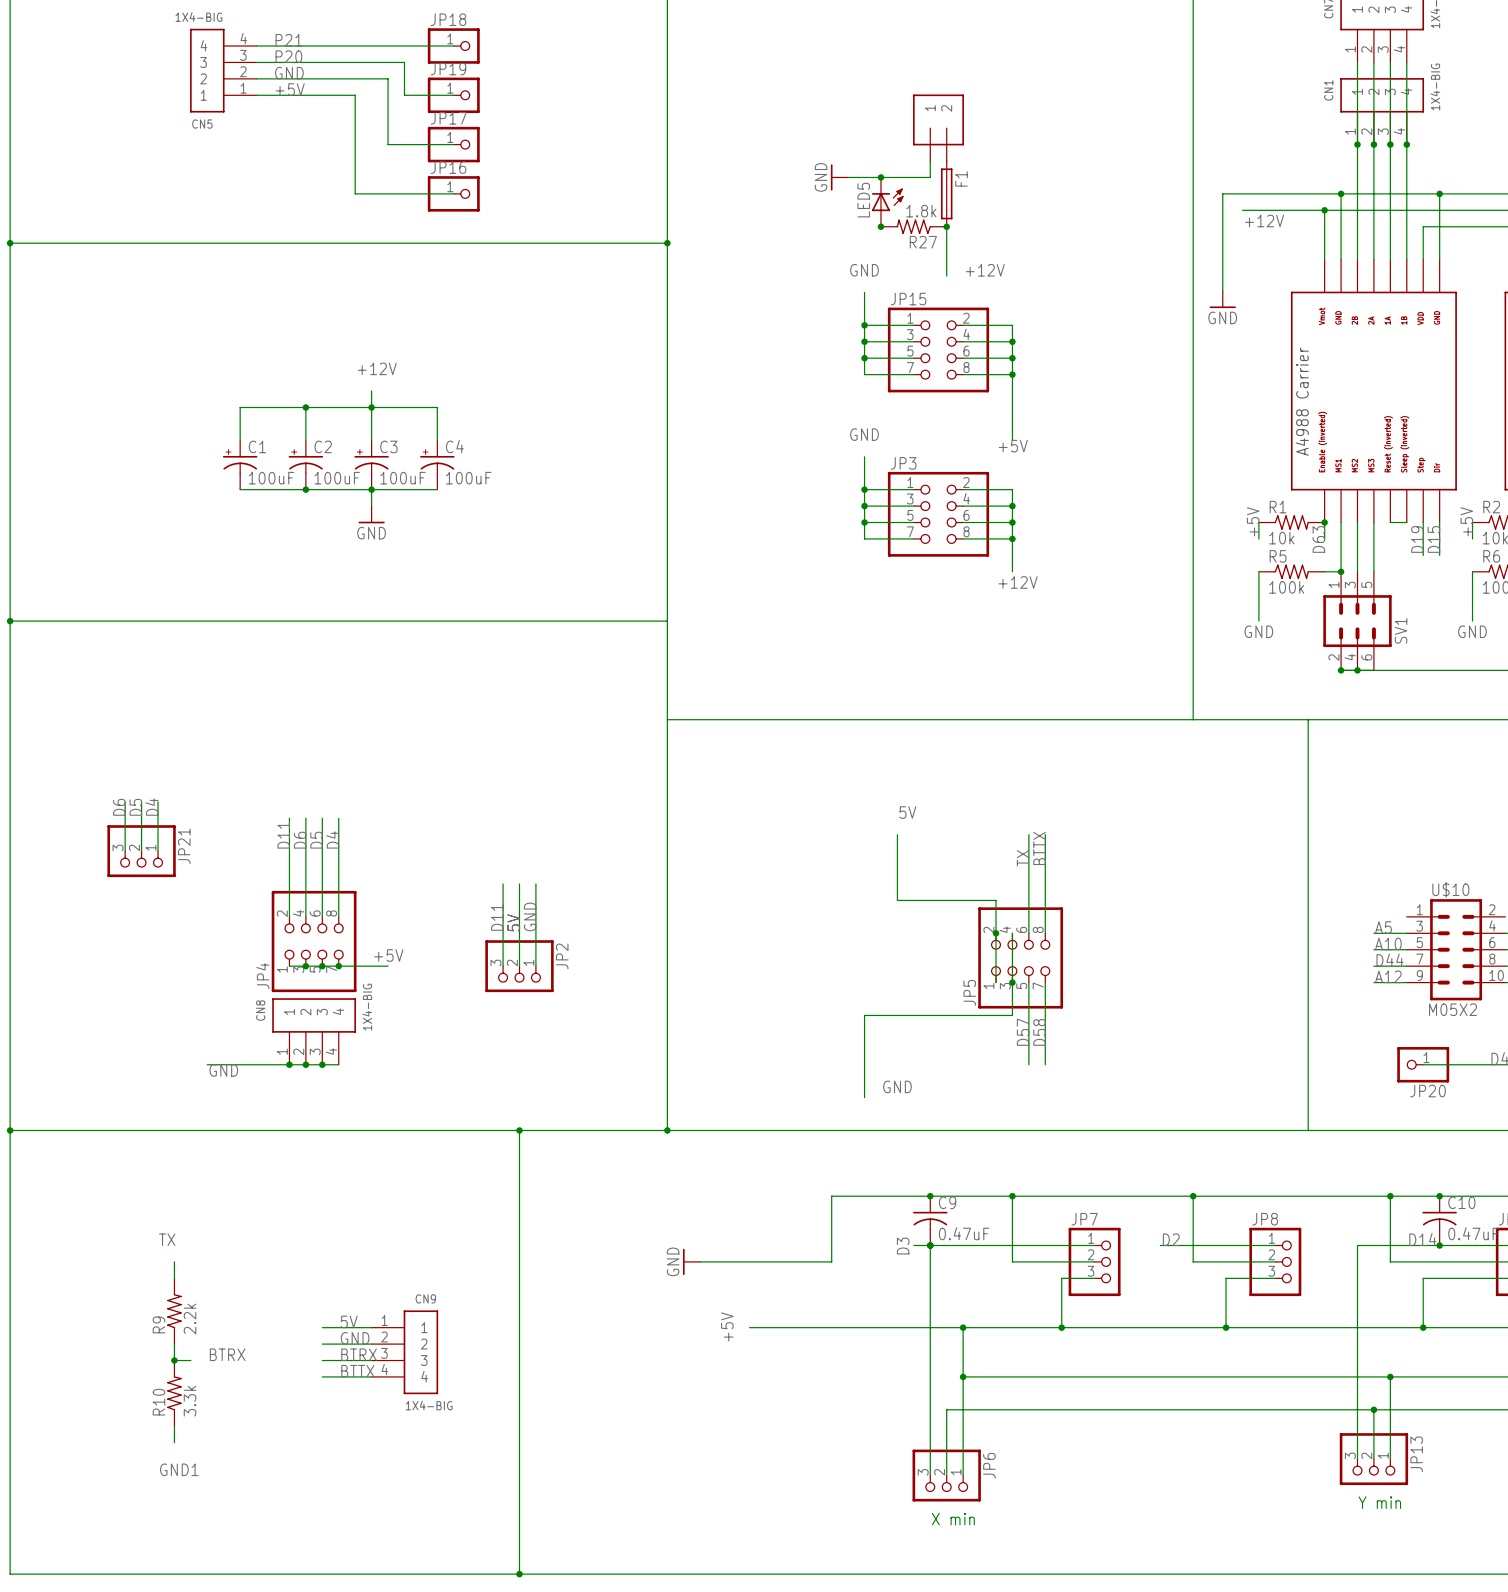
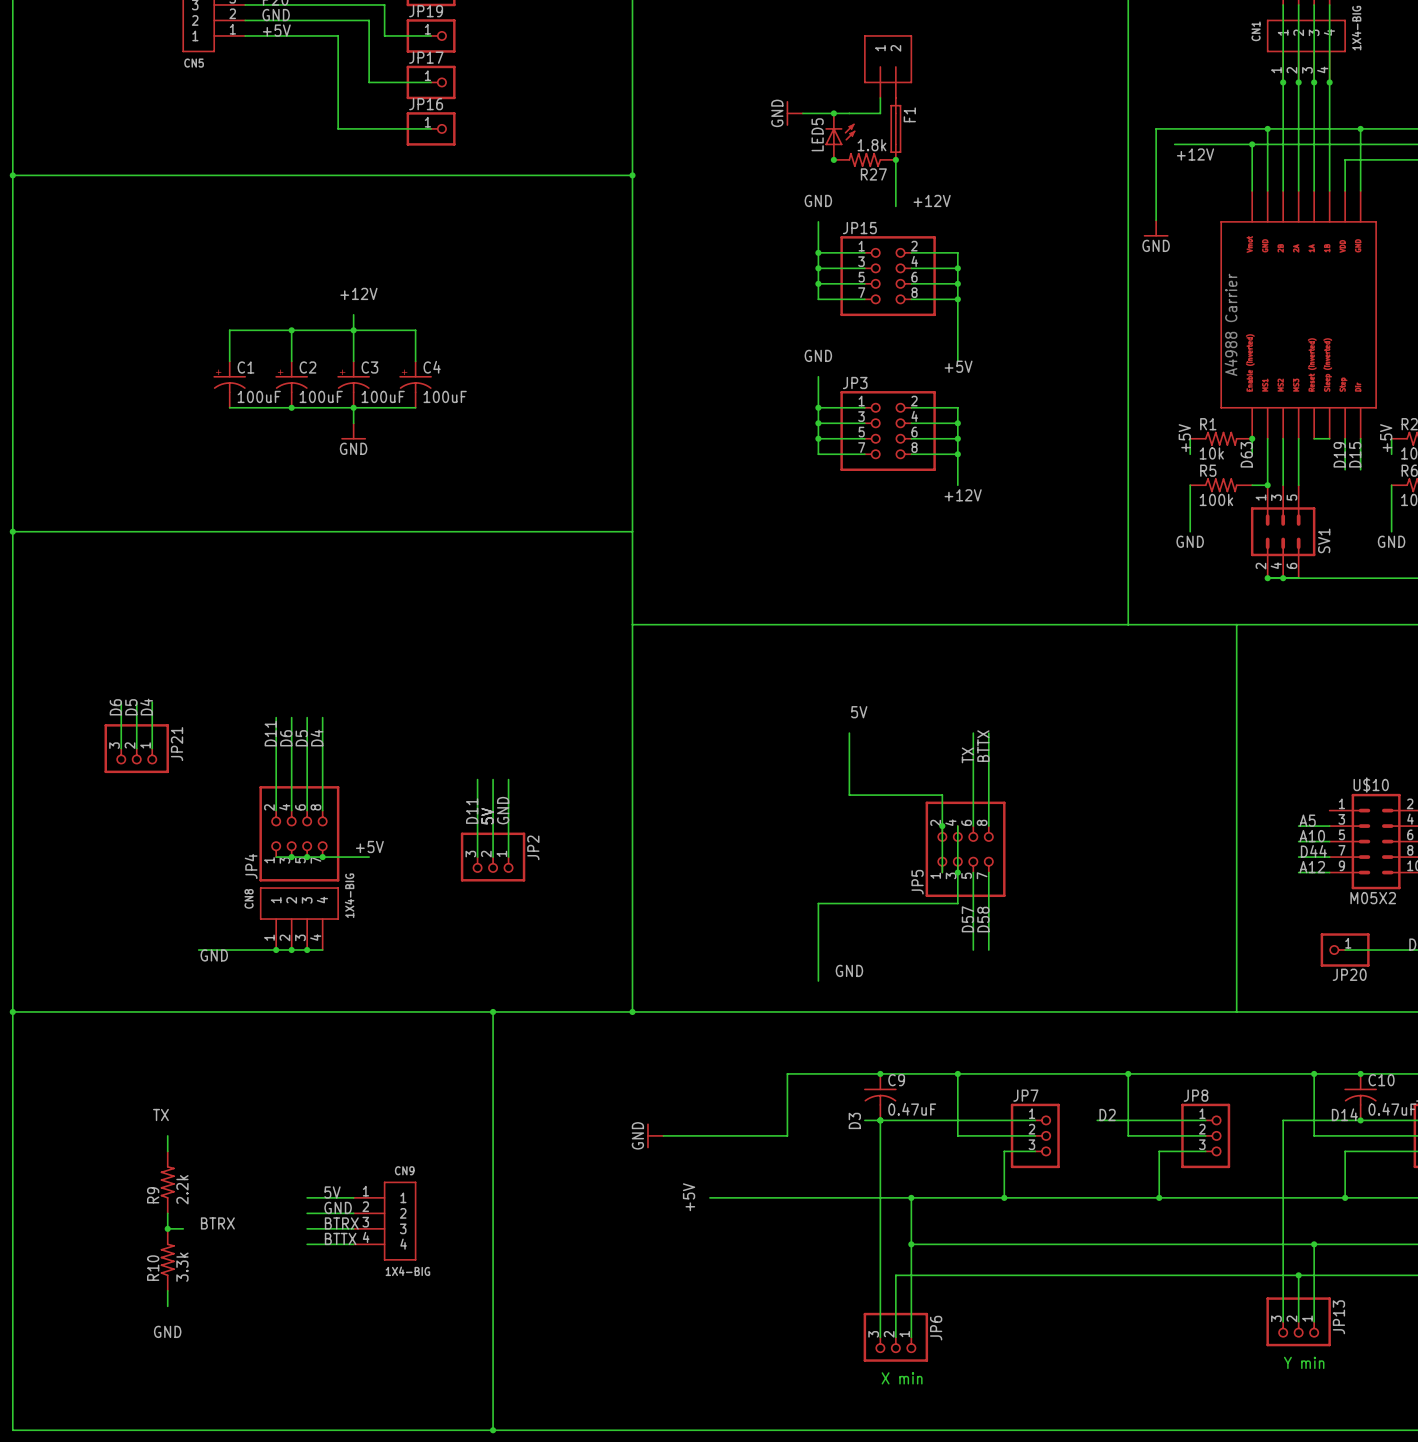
label: GND1 (179, 1469) -> GND (167, 1331)

